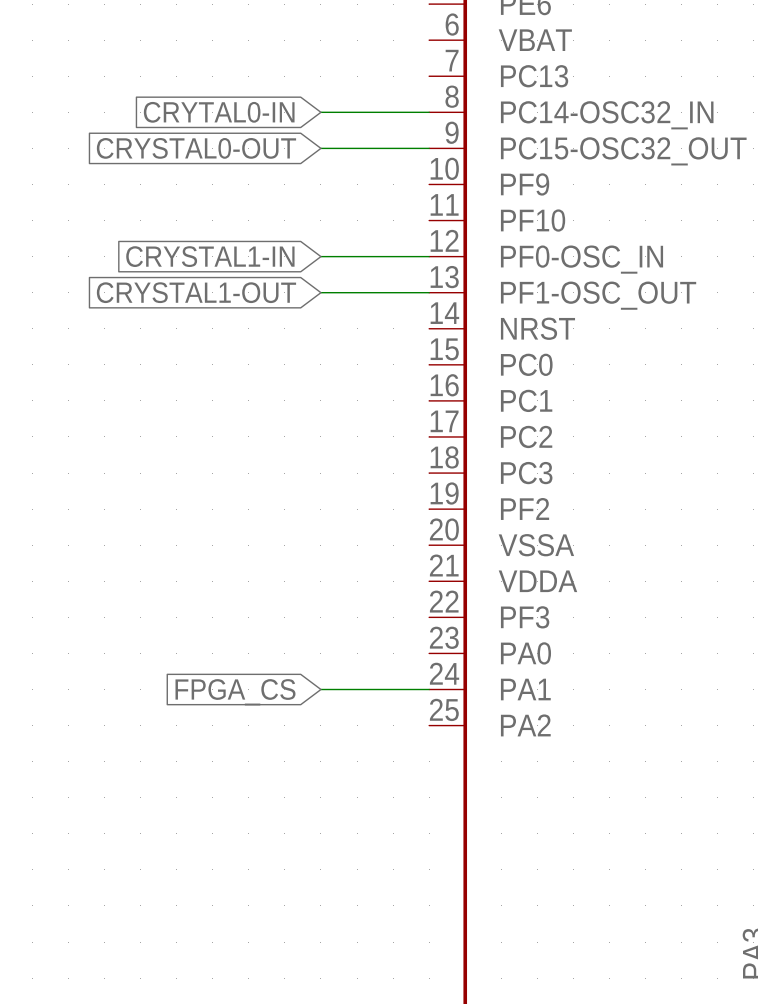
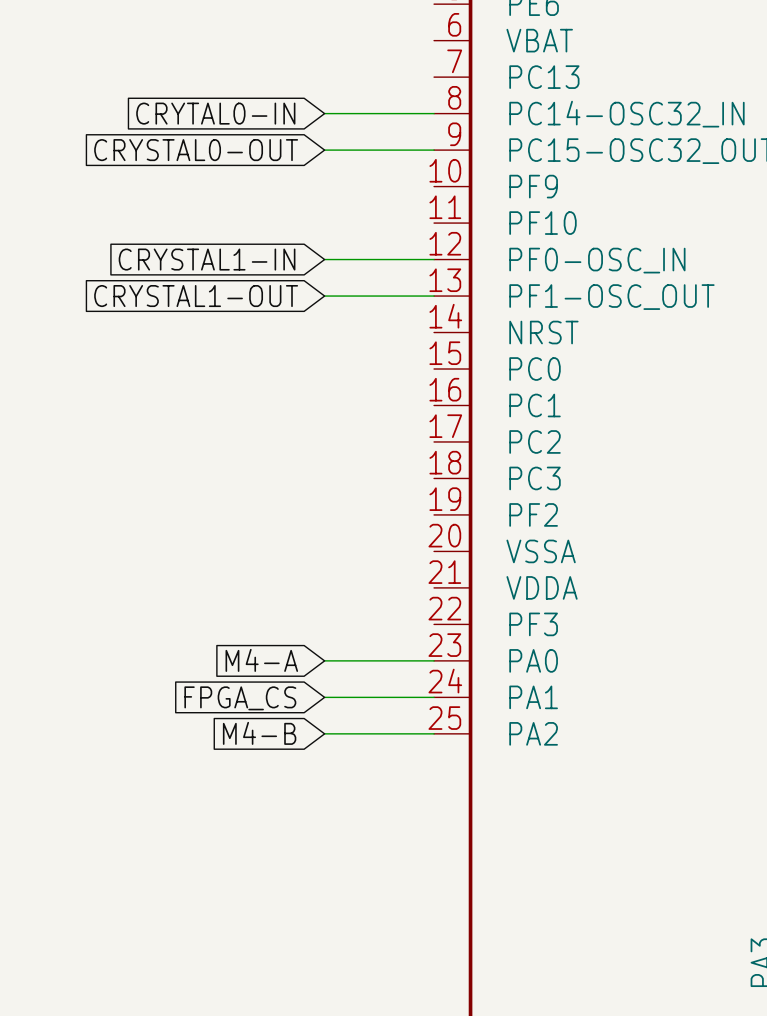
global label: none -> M4-A (261, 660)
wire: none -> (324, 660) (434, 660)
global label: none -> M4-B (259, 733)
wire: none -> (324, 733) (434, 733)

